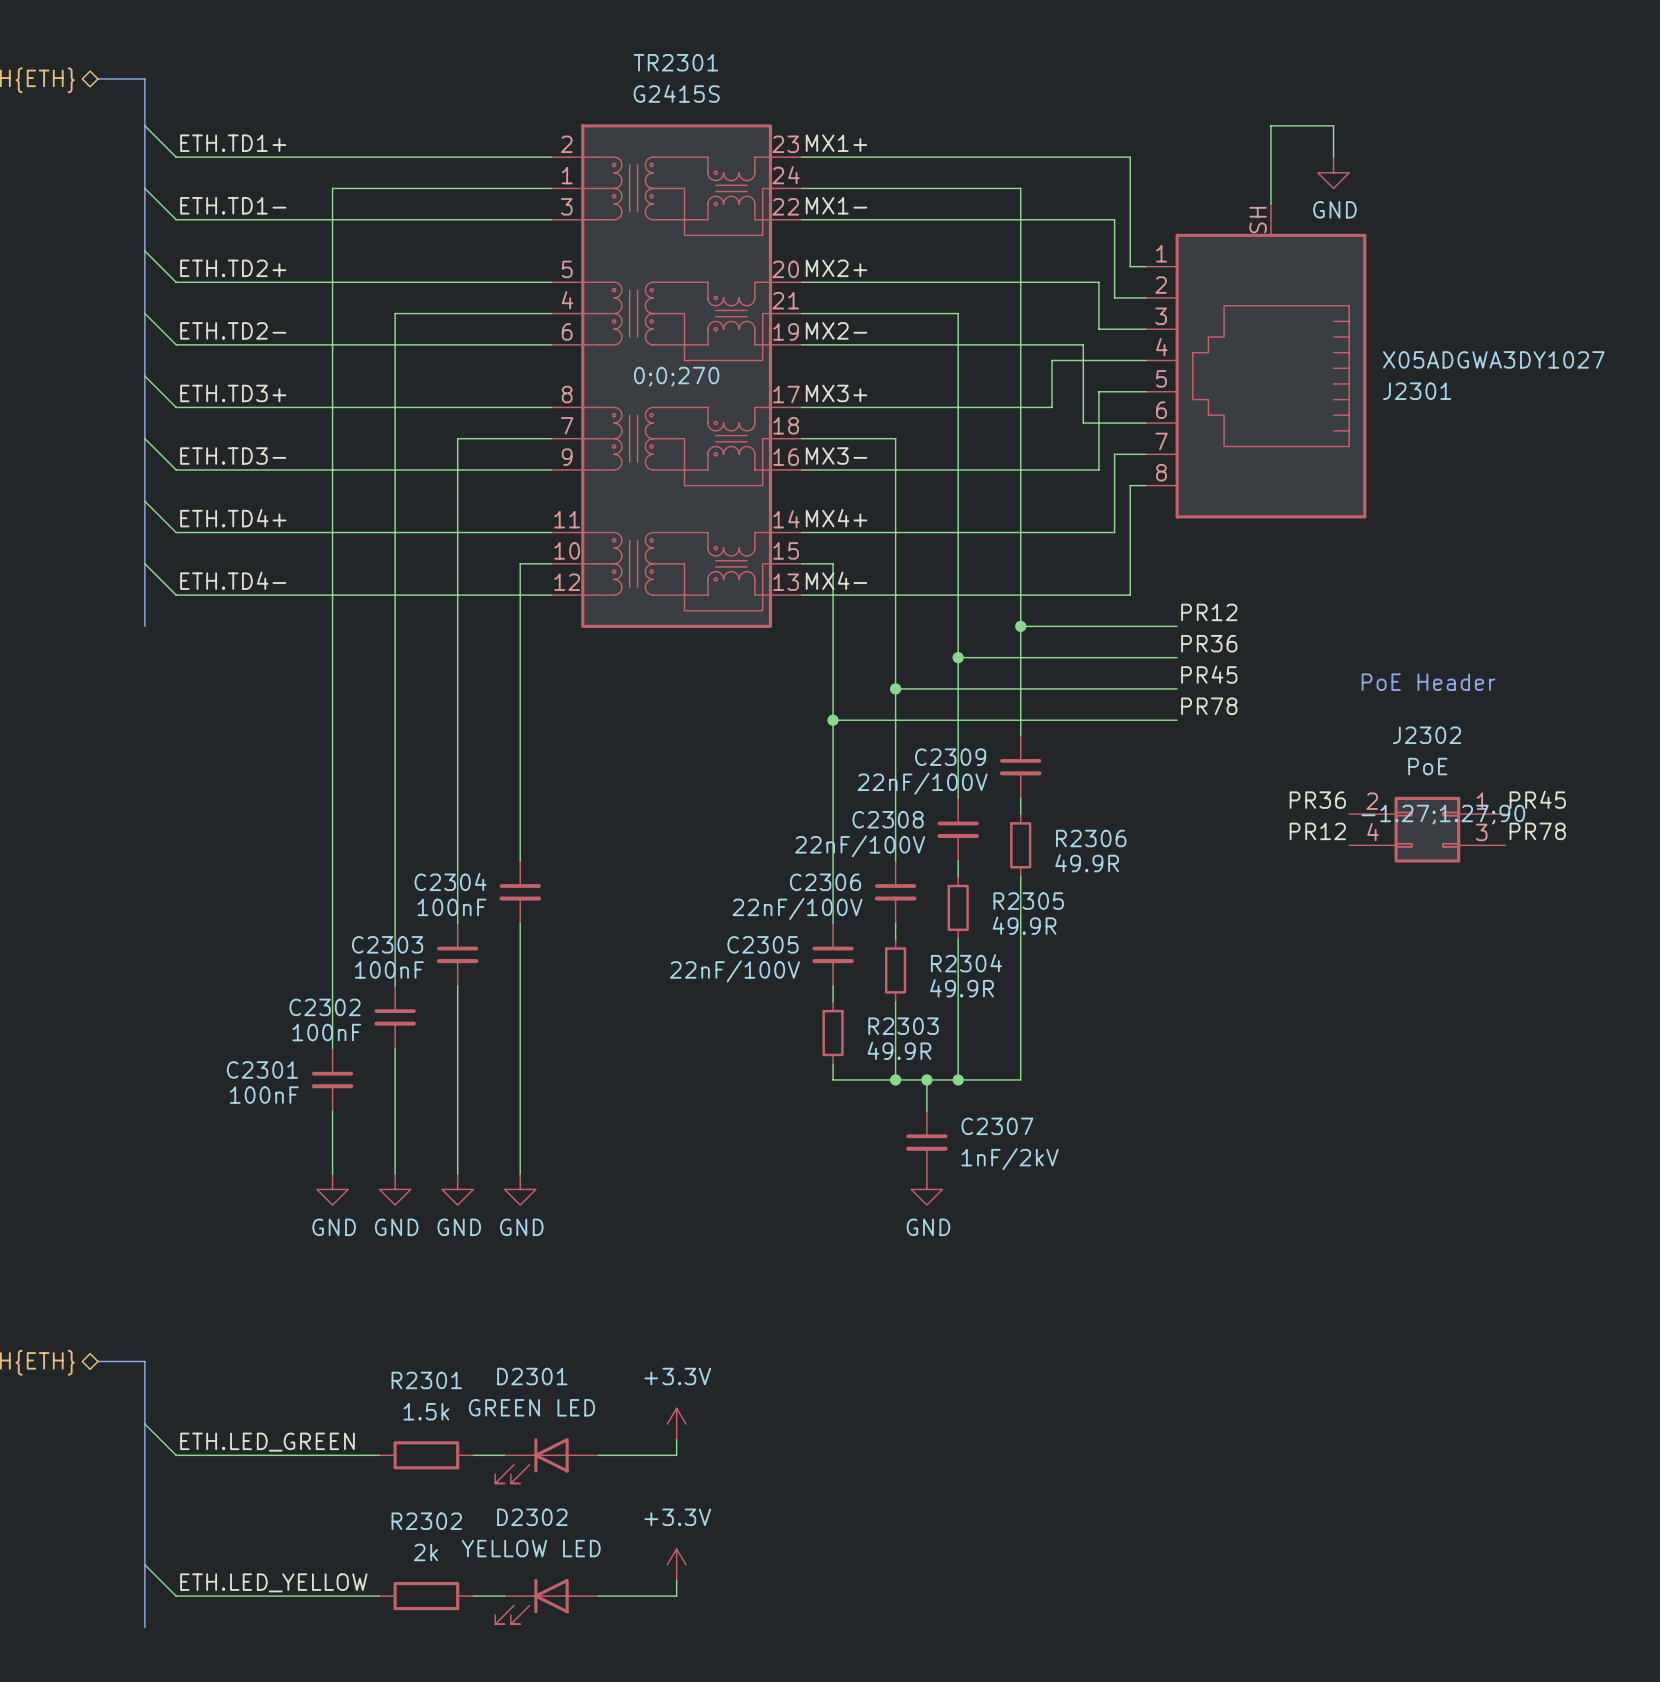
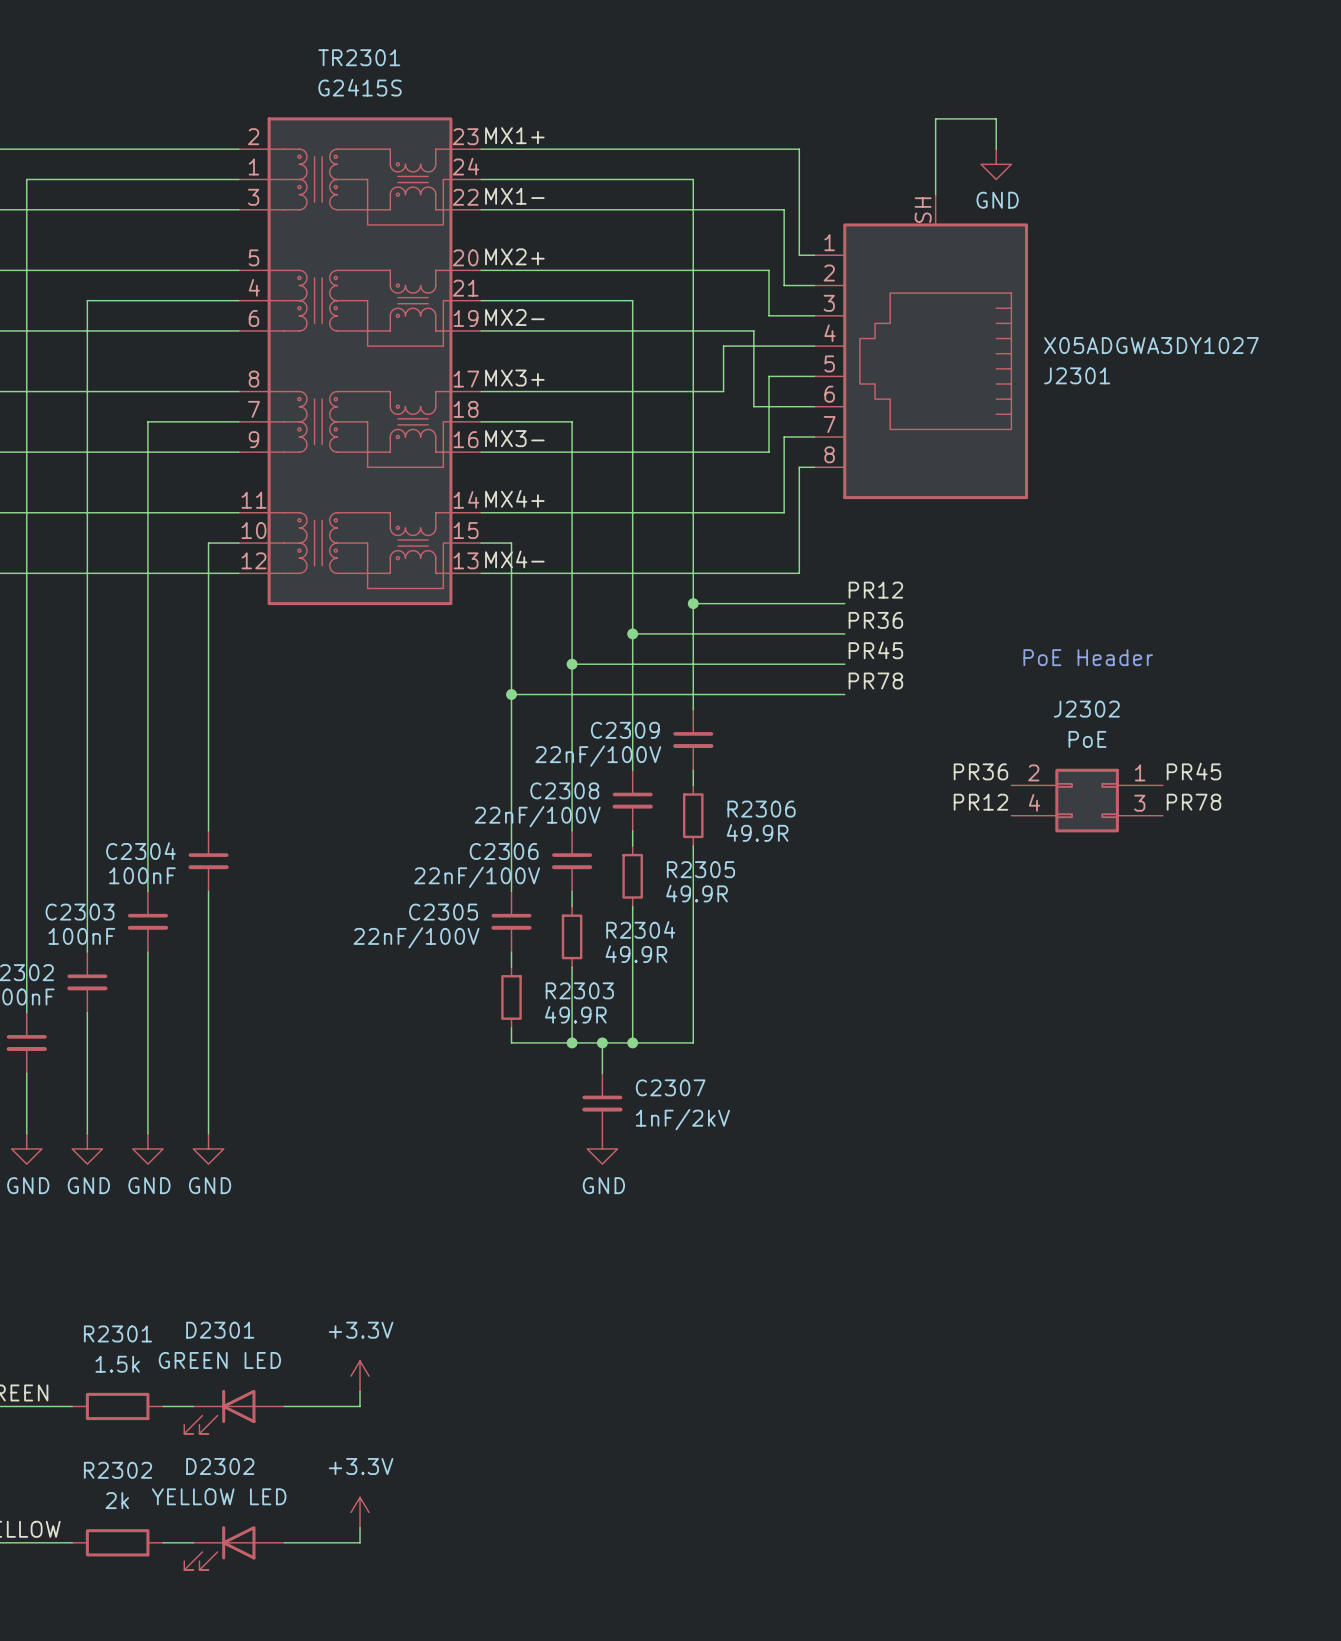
TR2301 text: 0;0;270 (676, 376) -> none
J2302 text: -1.27;1.27;90 (1443, 814) -> none

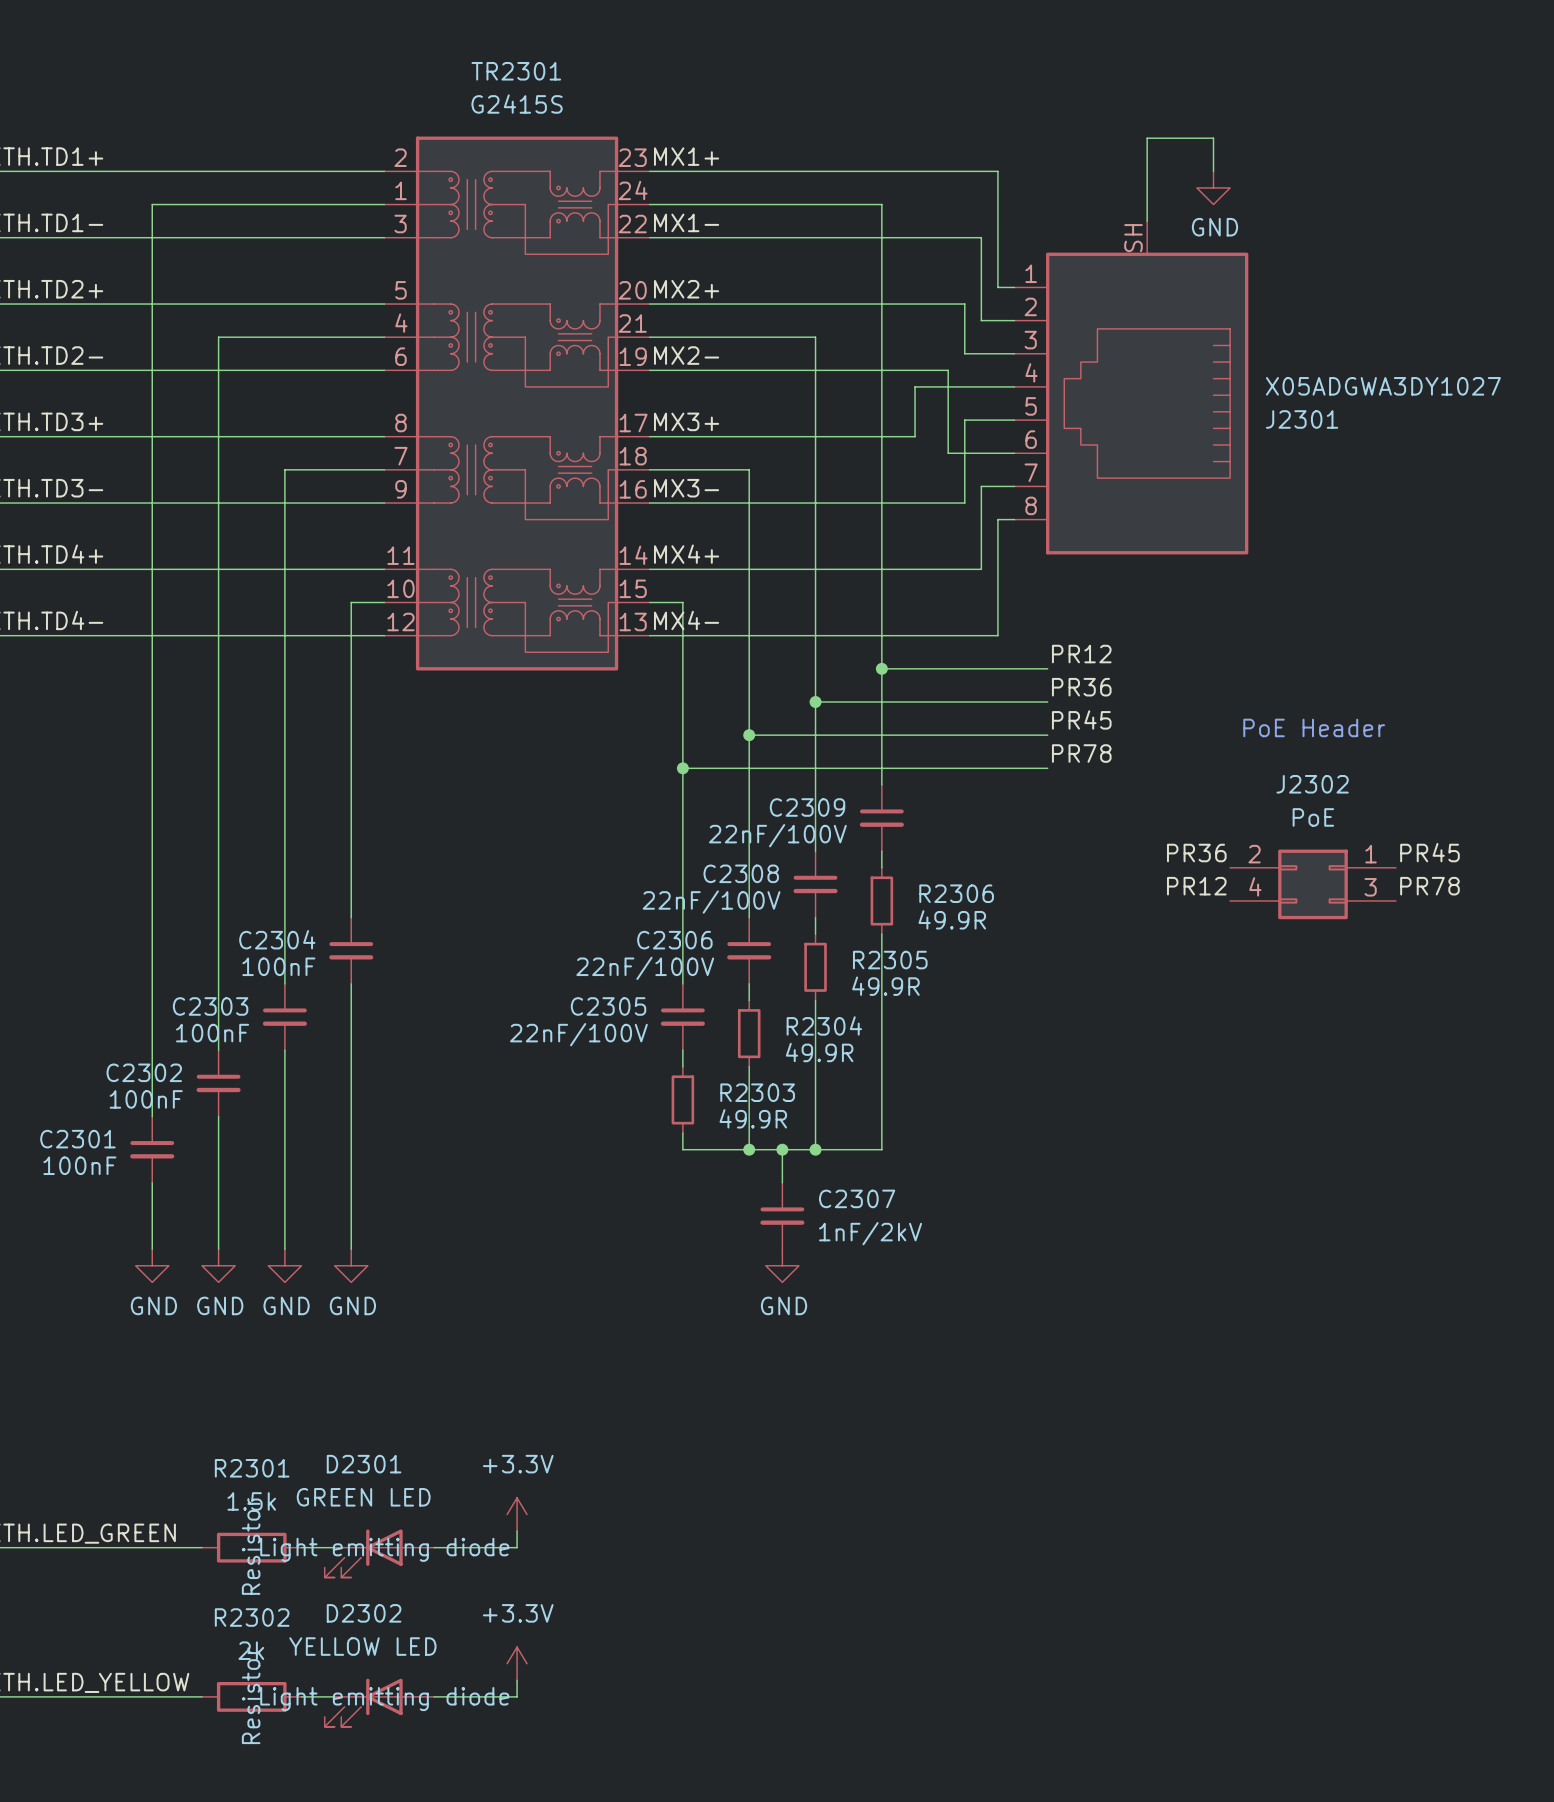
R2301 text: none -> Resistor (251, 1546)
D2301 text: none -> Light emitting diode (384, 1549)
R2302 text: none -> Resistor (251, 1695)
D2302 text: none -> Light emitting diode (384, 1699)

